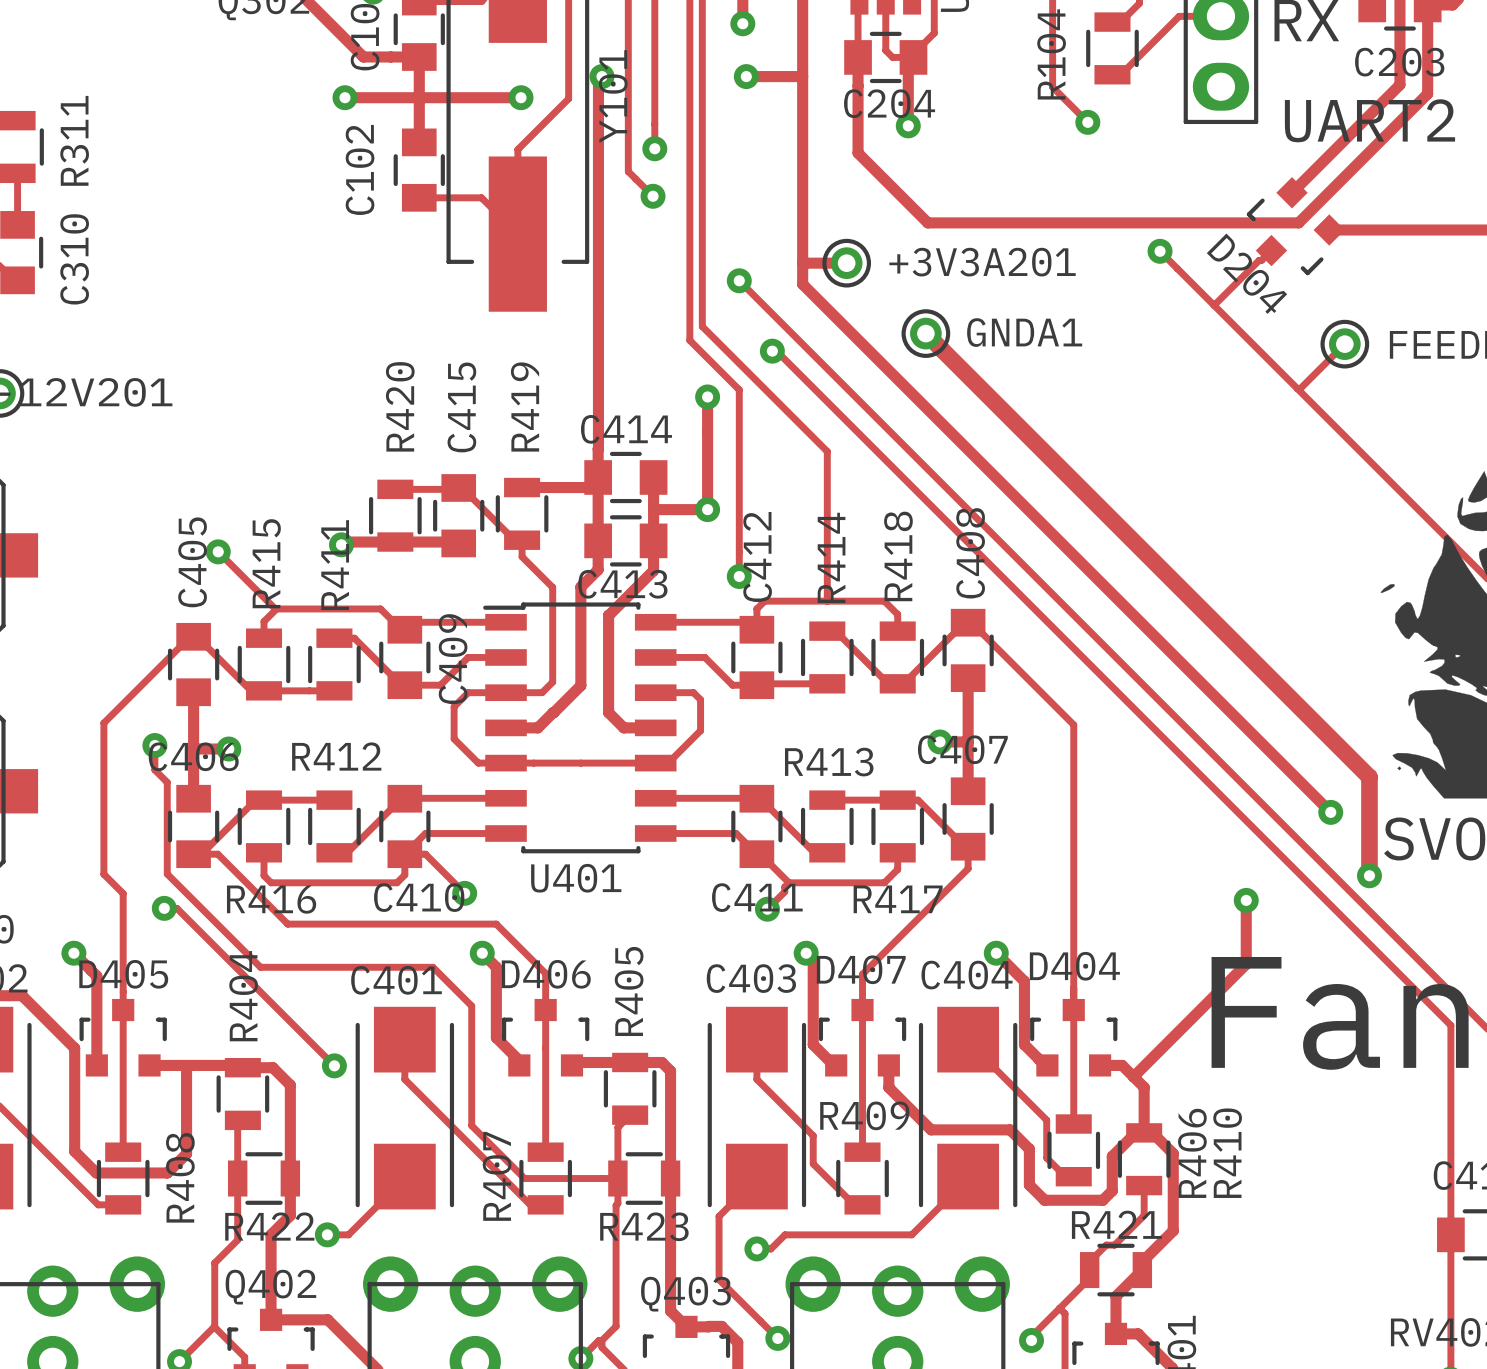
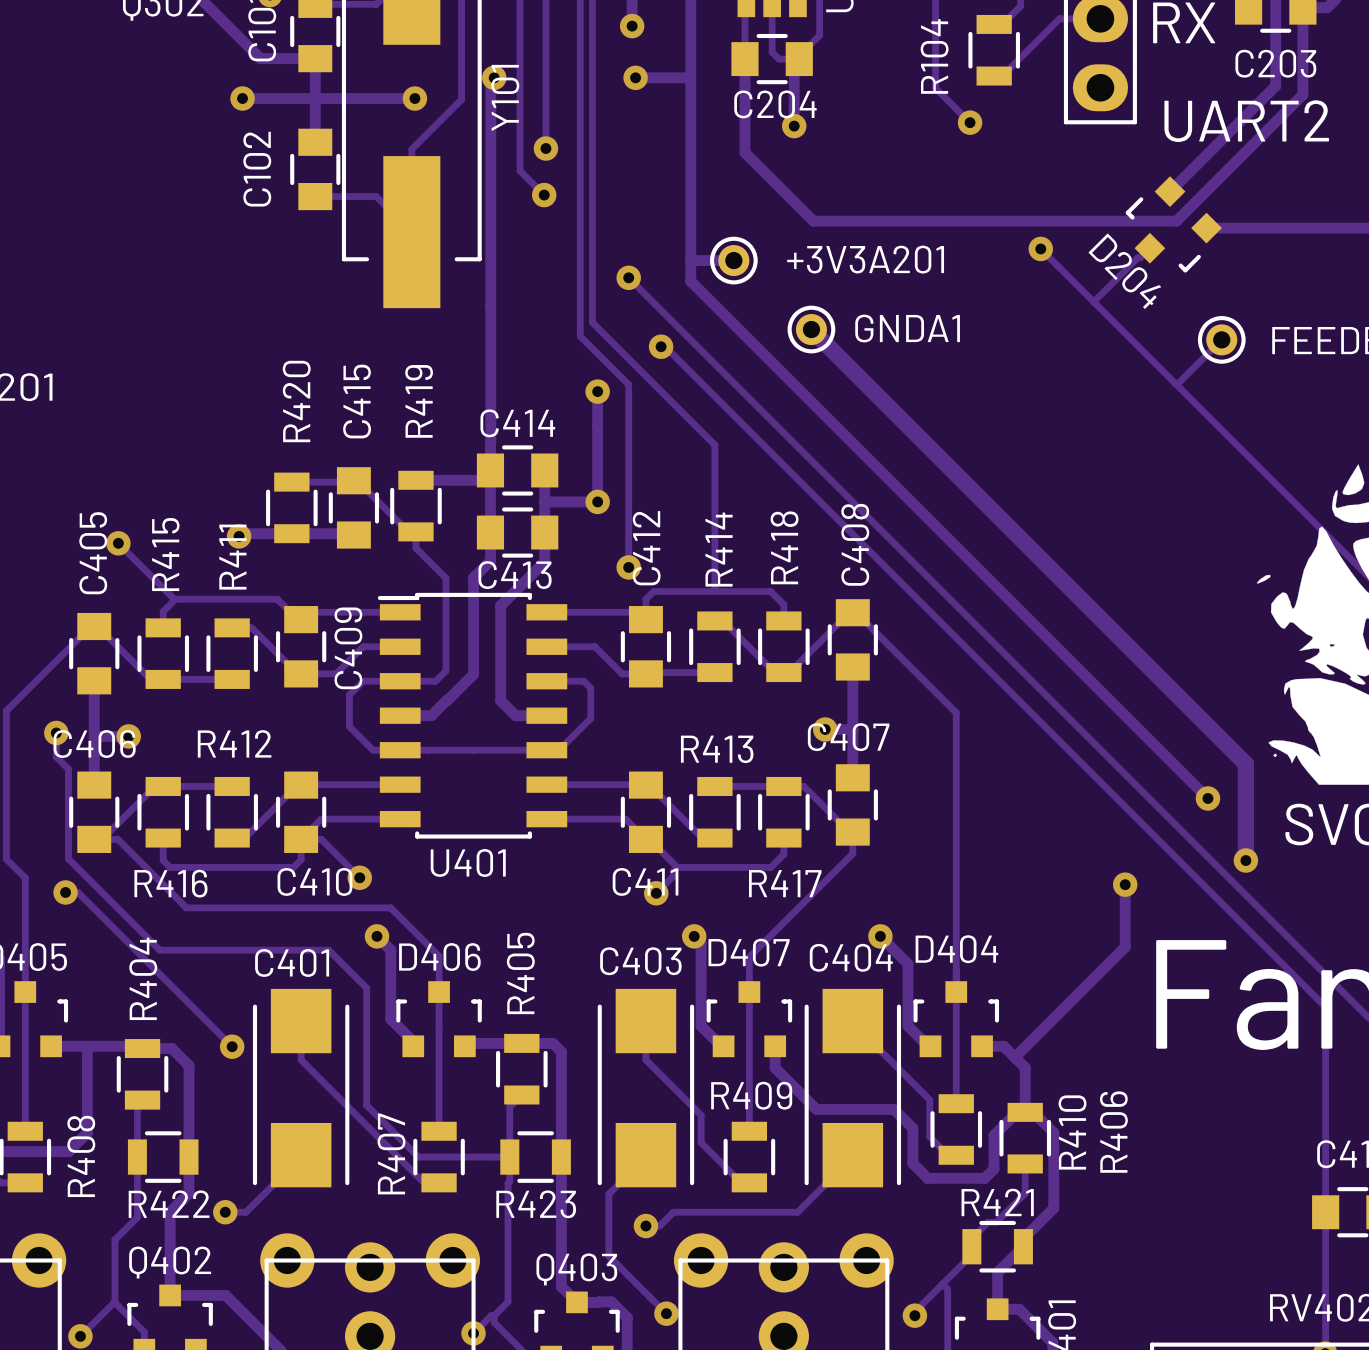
R406 name position: R406 (1192, 1153) -> R406 (1113, 1132)
R410 name position: R410 (1227, 1153) -> R410 (1072, 1132)

